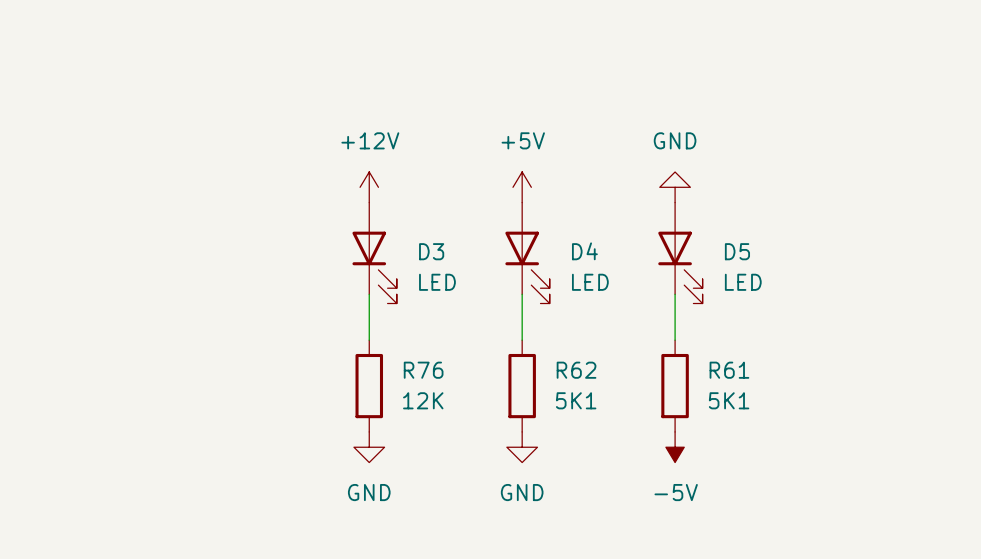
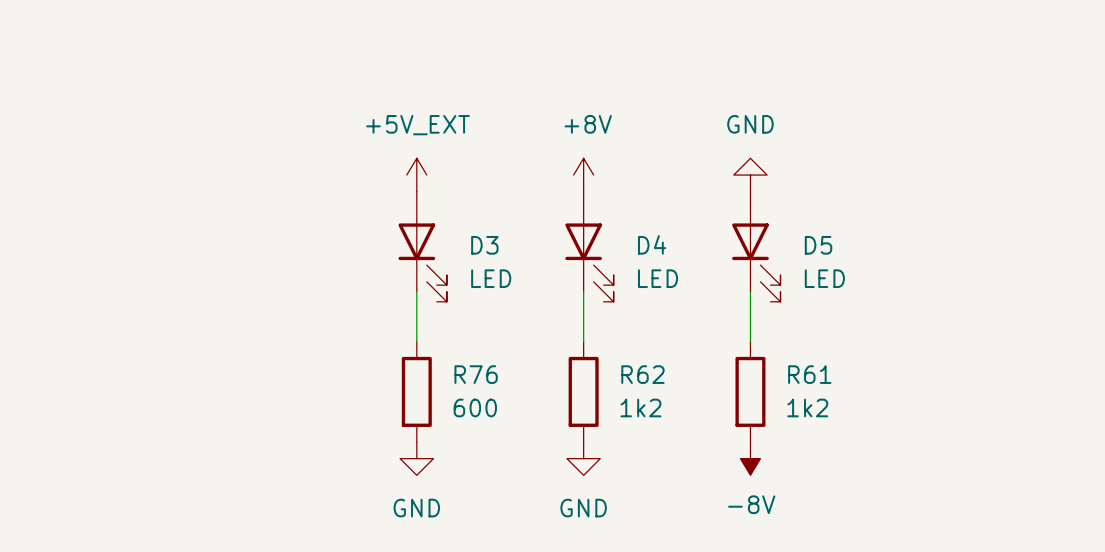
power symbol: +12V (369, 187) -> +5V_EXT (416, 175)
power symbol: +5V (522, 187) -> +8V (583, 175)
R76 value: 12K (423, 400) -> 600 (475, 407)
R62 value: 5K1 (576, 400) -> 1k2 (640, 407)
R61 value: 5K1 (729, 400) -> 1k2 (807, 407)
power symbol: -5V (675, 447) -> -8V (750, 458)

